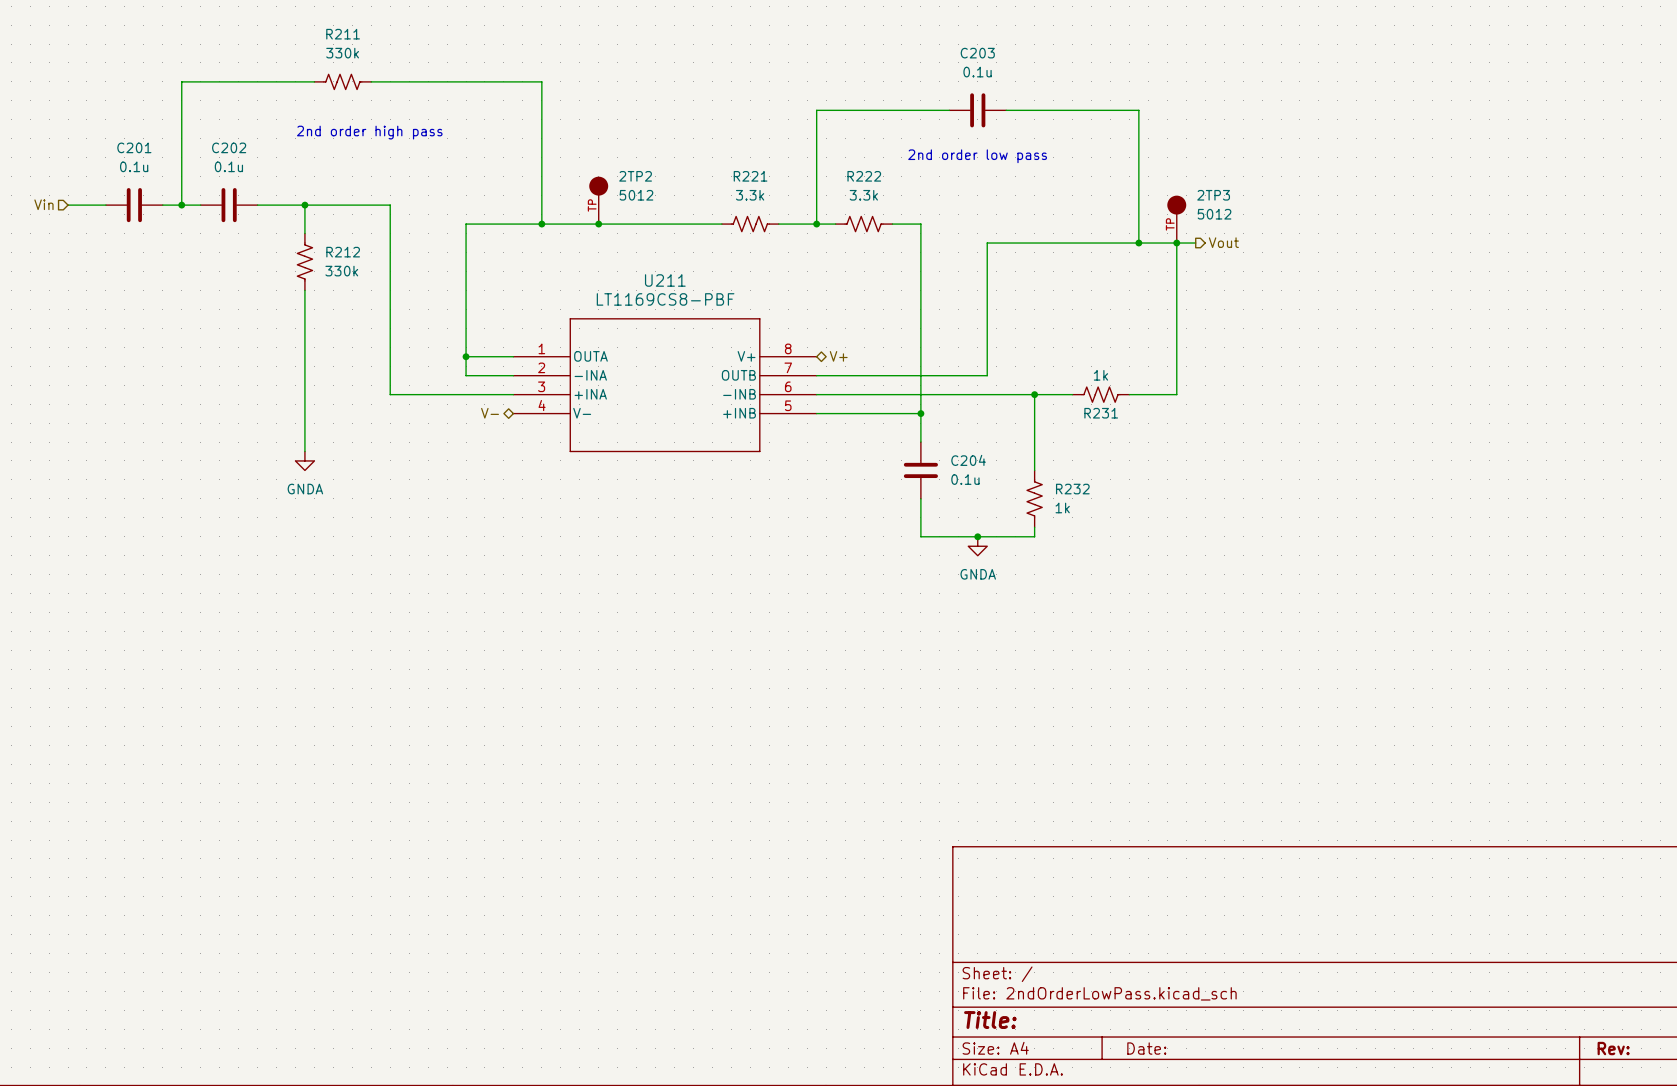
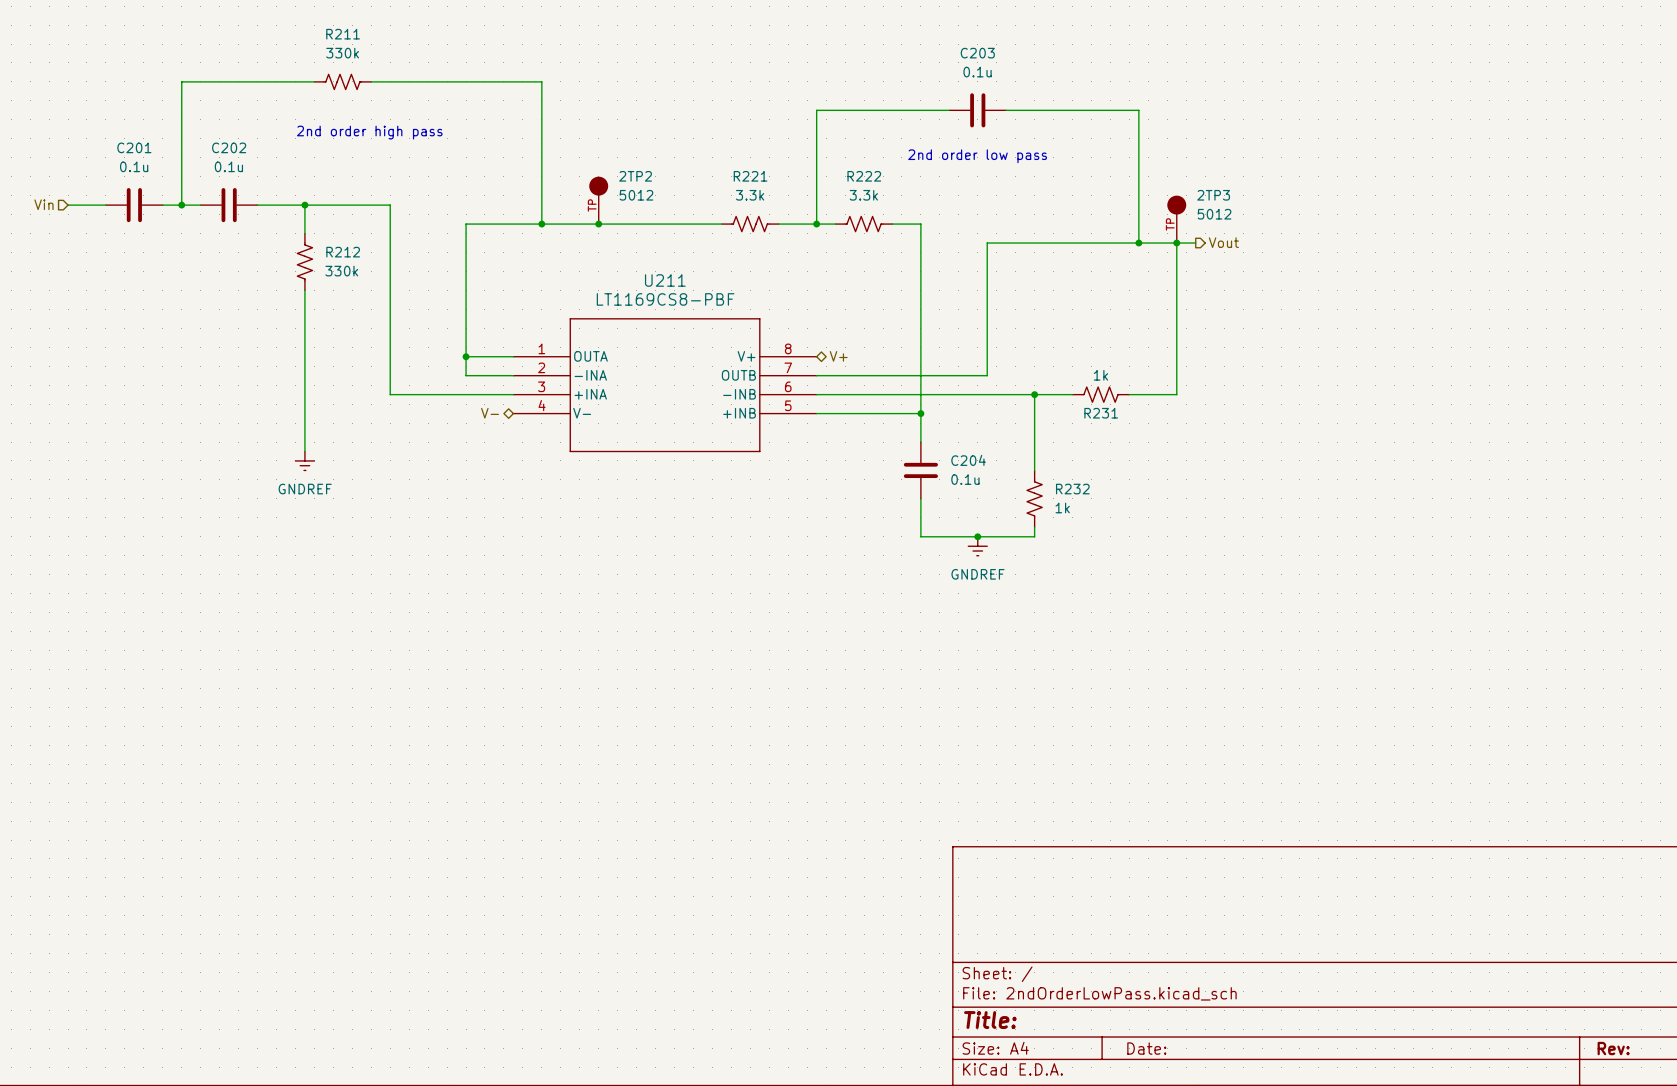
power symbol: GNDA (304, 460) -> GNDREF (304, 460)
power symbol: GNDA (977, 546) -> GNDREF (977, 546)

